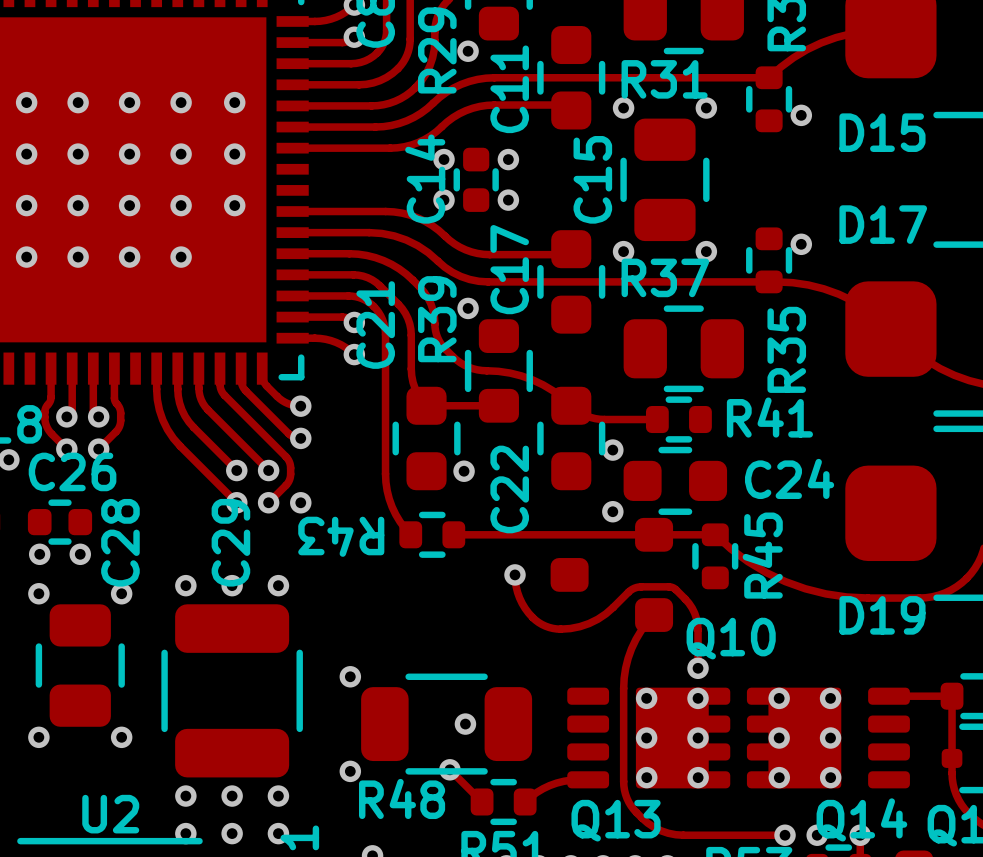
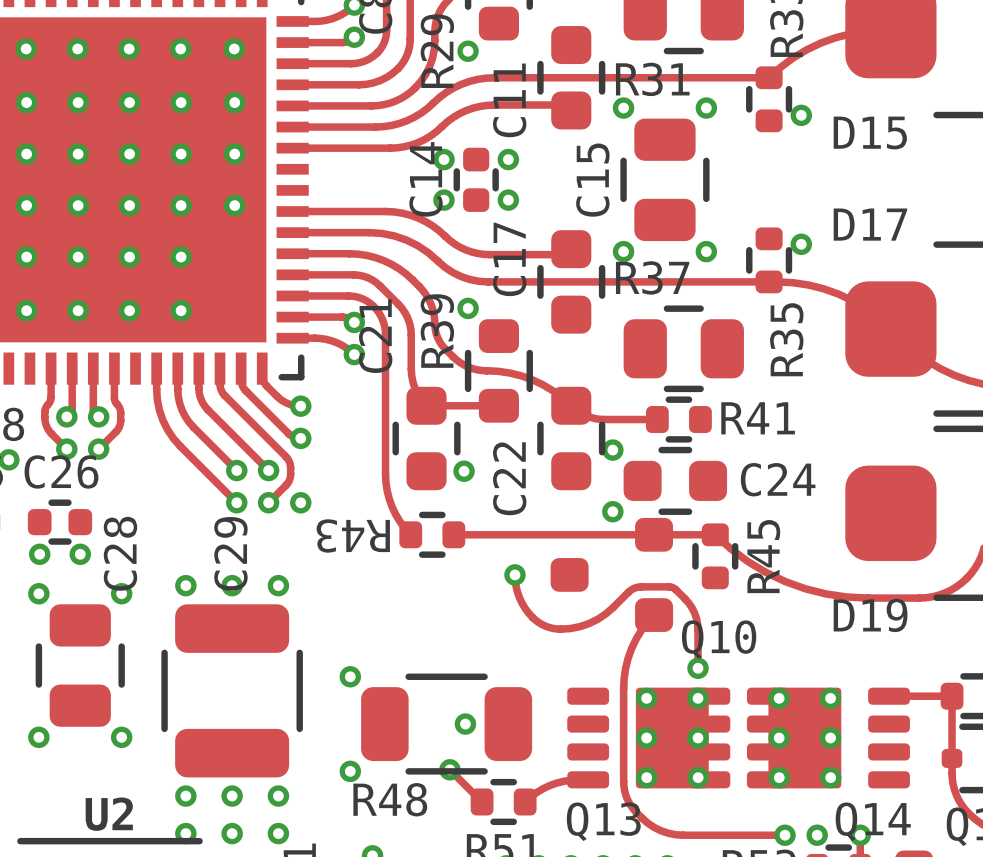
via: none -> (26, 48)
via: none -> (77, 48)
via: none -> (129, 48)
via: none -> (180, 48)
via: none -> (234, 48)
via: none -> (26, 310)
via: none -> (78, 310)
via: none -> (129, 310)
via: none -> (181, 310)

